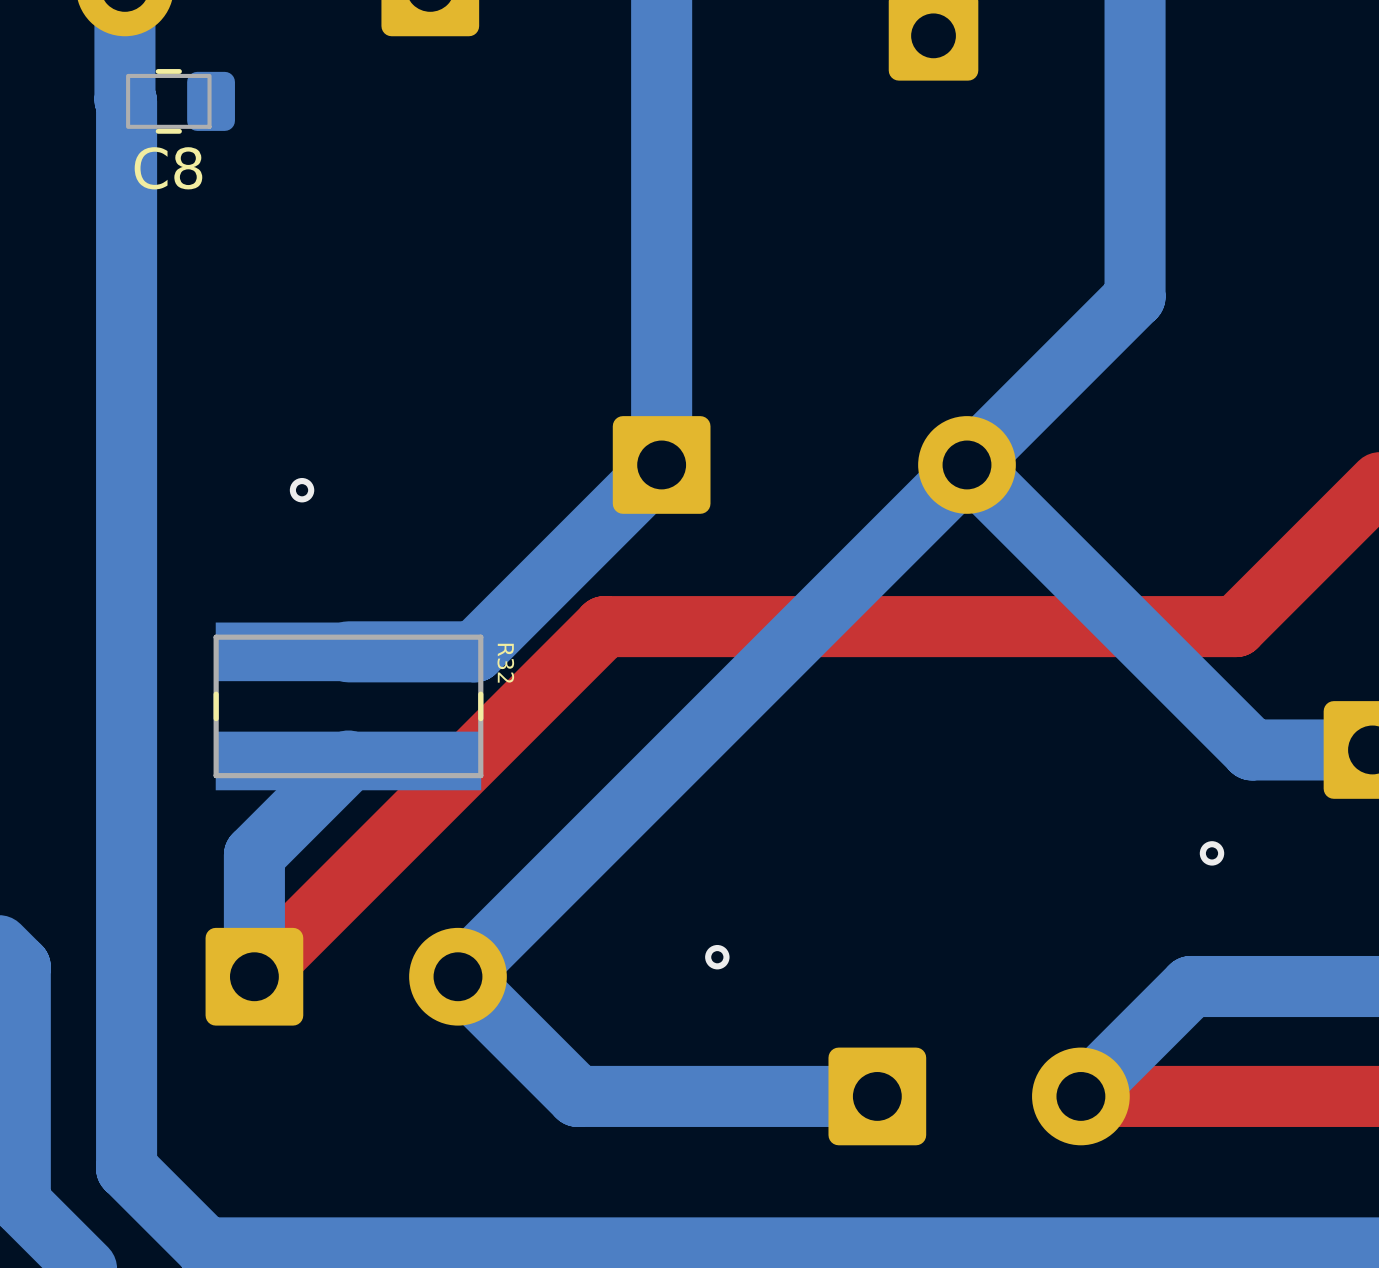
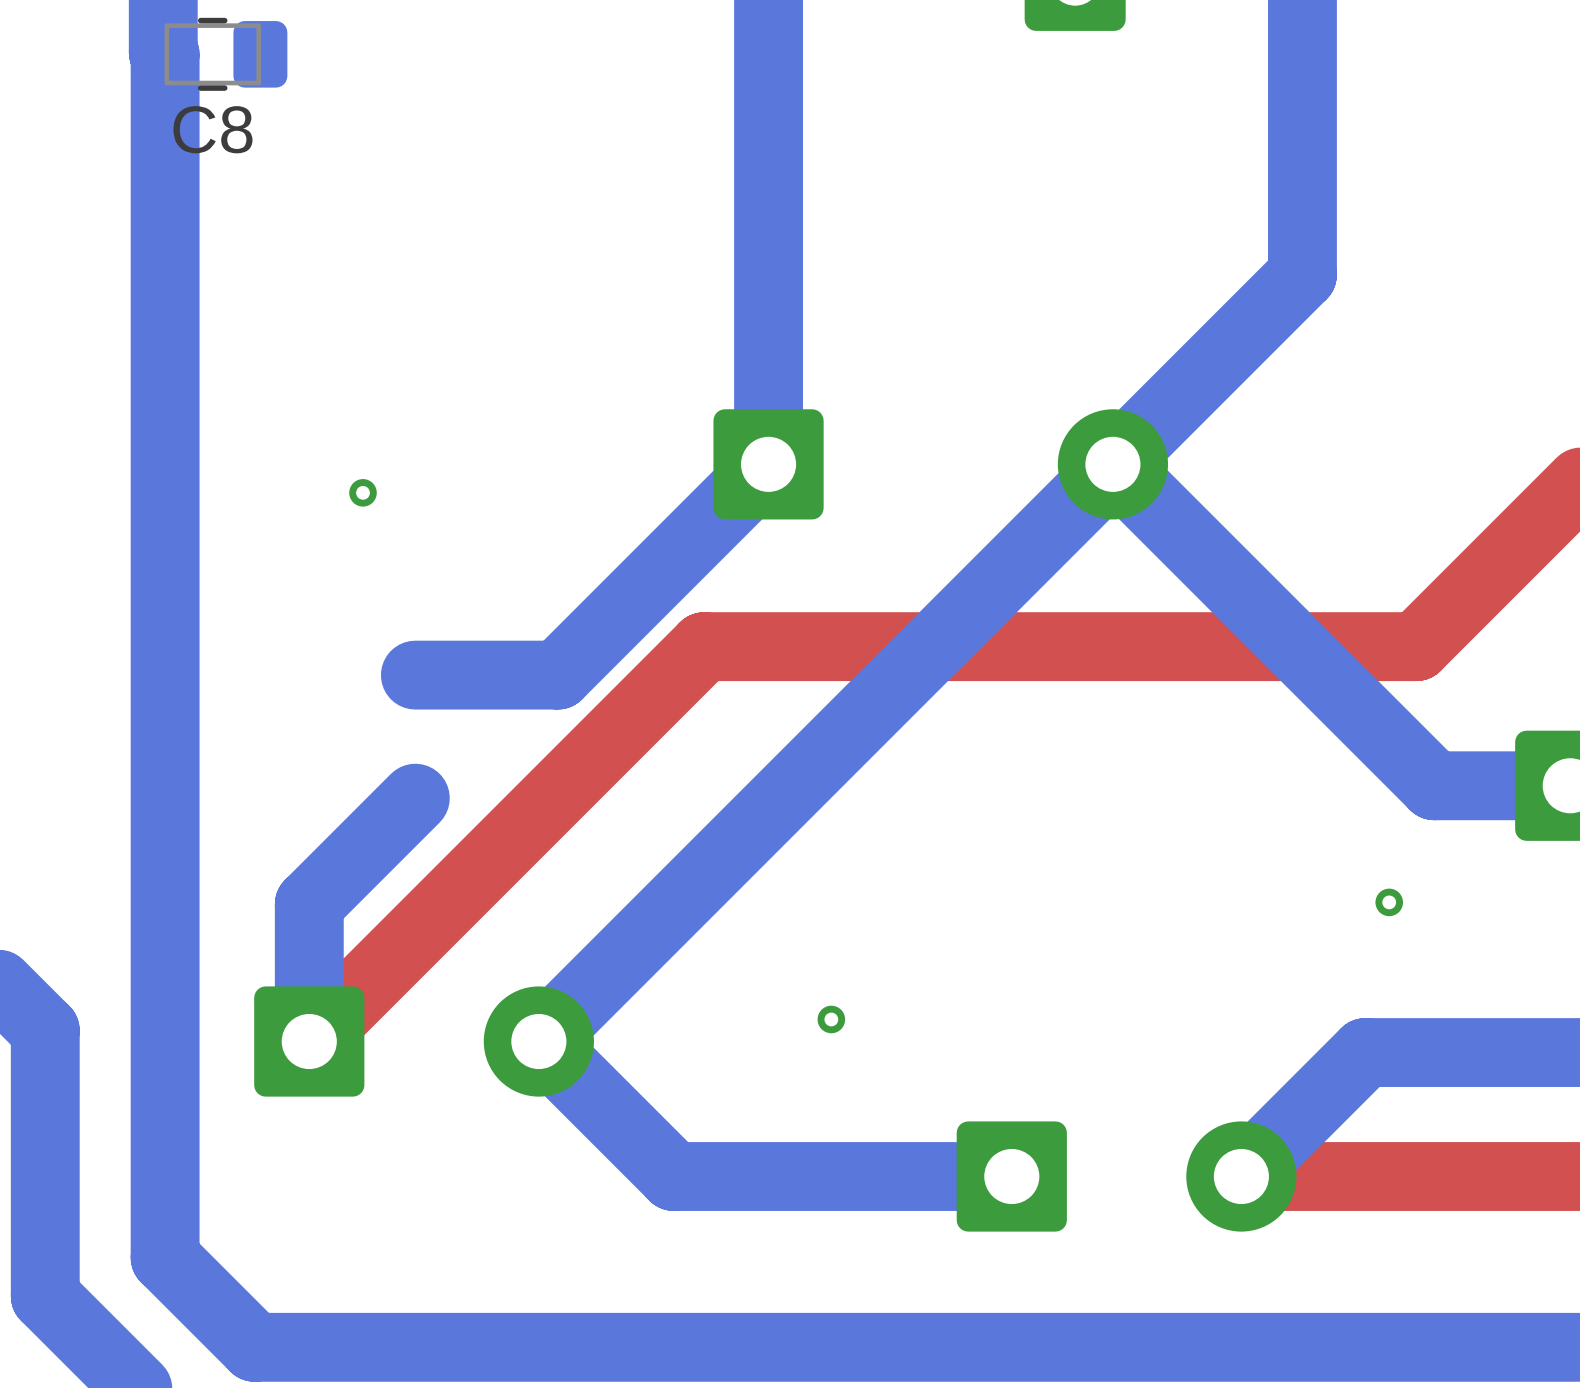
R32: (348, 706) -> none

